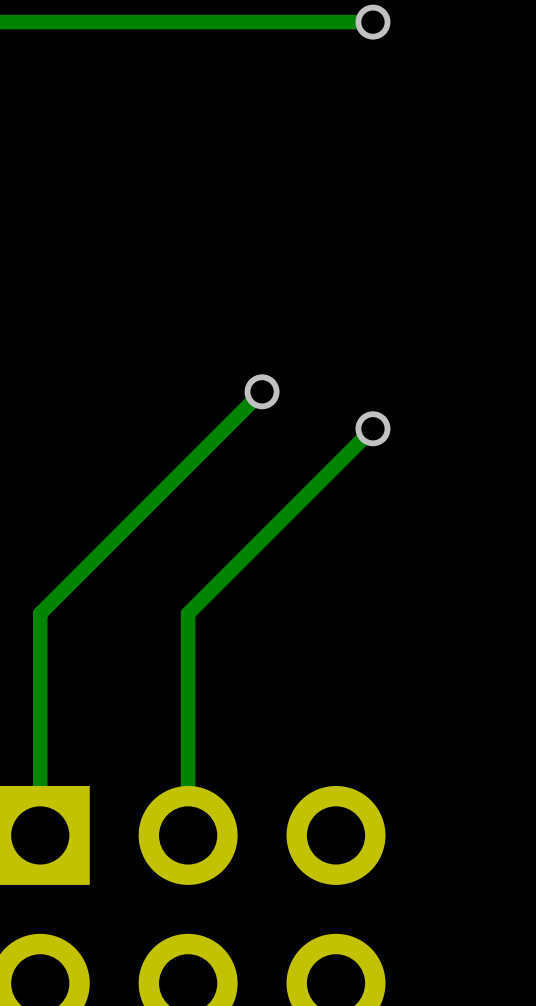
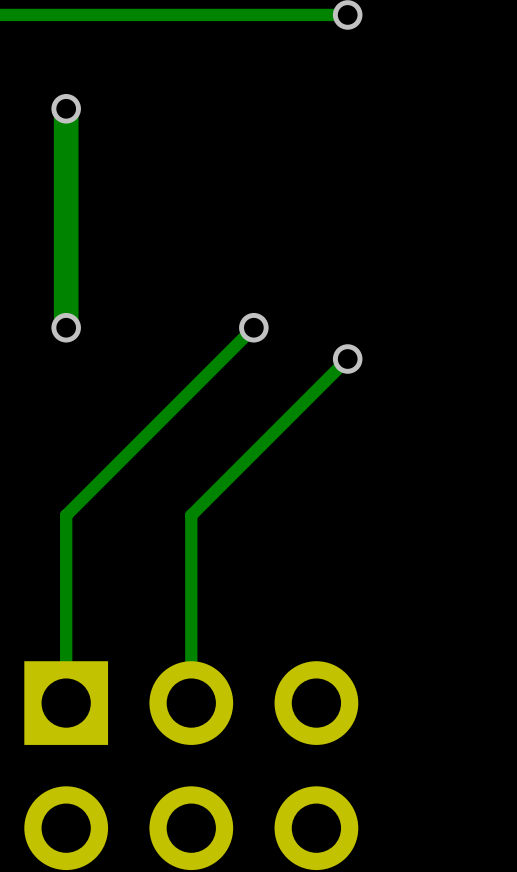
track: none -> (66, 108) (66, 327)
via: none -> (66, 108)
via: none -> (66, 327)

